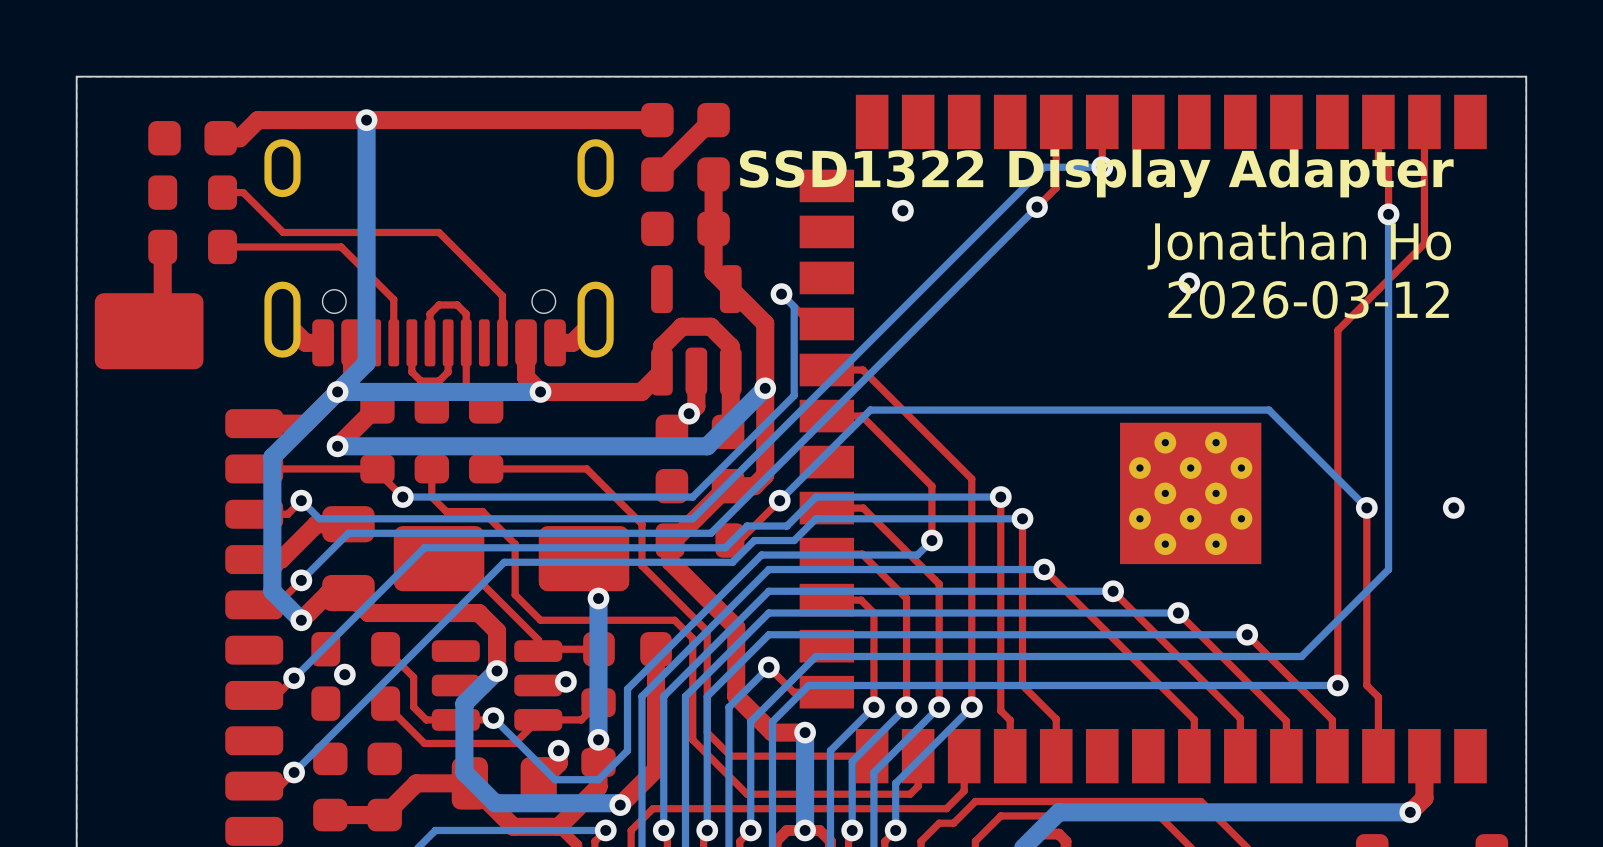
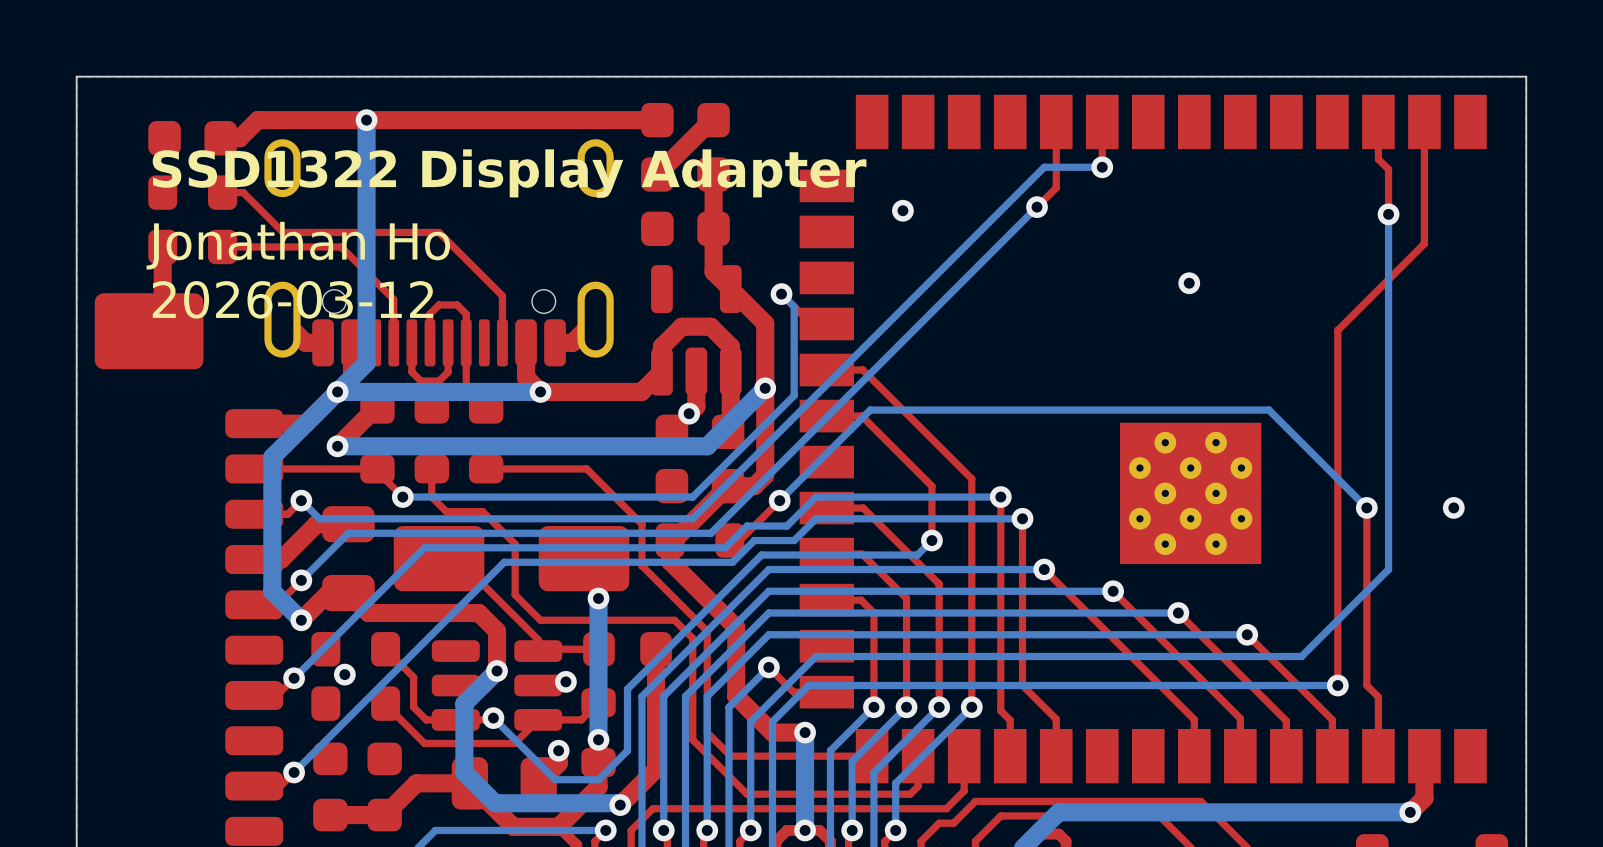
text: none -> SSD1322 Display Adapter (509, 173)
text: SSD1322 Display Adapter (1096, 173) -> none
text: none -> Jonathan Ho (298, 245)
text: Jonathan Ho (1299, 245) -> none
text: none -> 2026-03-12 (292, 299)
text: 2026-03-12 (1308, 299) -> none

